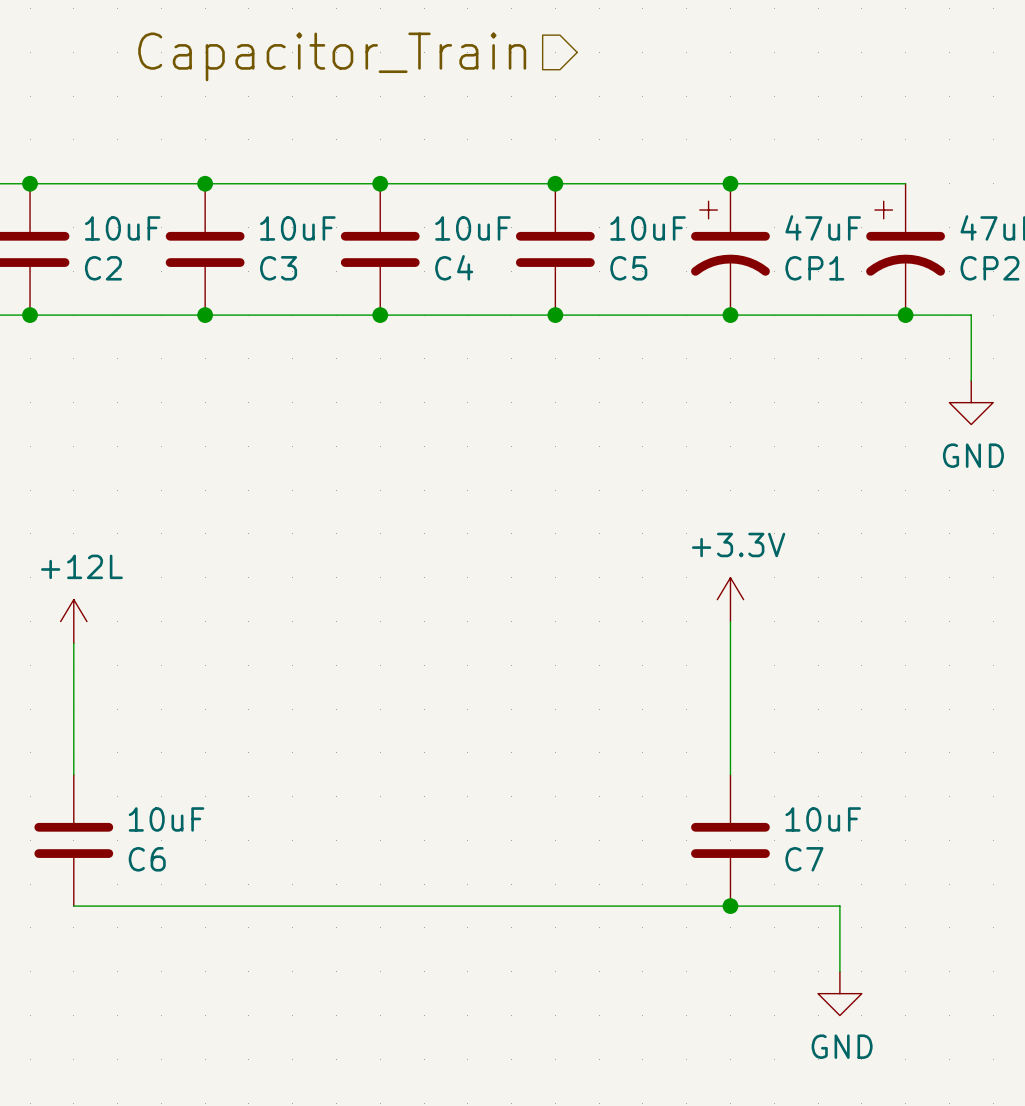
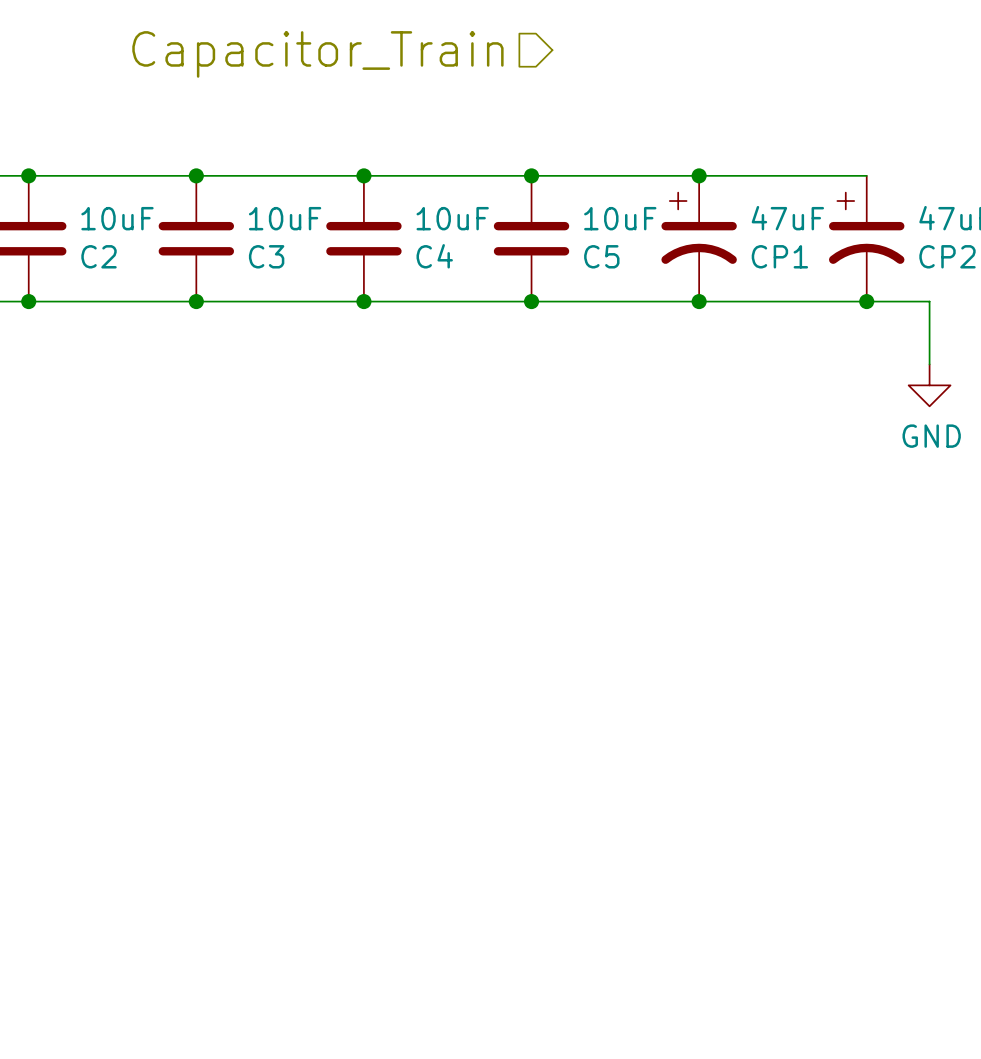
power symbol: +3.3V (730, 599) -> none
power symbol: +12L (73, 621) -> none
wire: (730, 621) (730, 774) -> none
wire: (73, 643) (73, 774) -> none
10uF: C6 (73, 840) -> none
10uF: C7 (730, 840) -> none
wire: (73, 906) (839, 906) (839, 971) -> none
junction: (730, 906) -> none
power symbol: GND (839, 993) -> none

